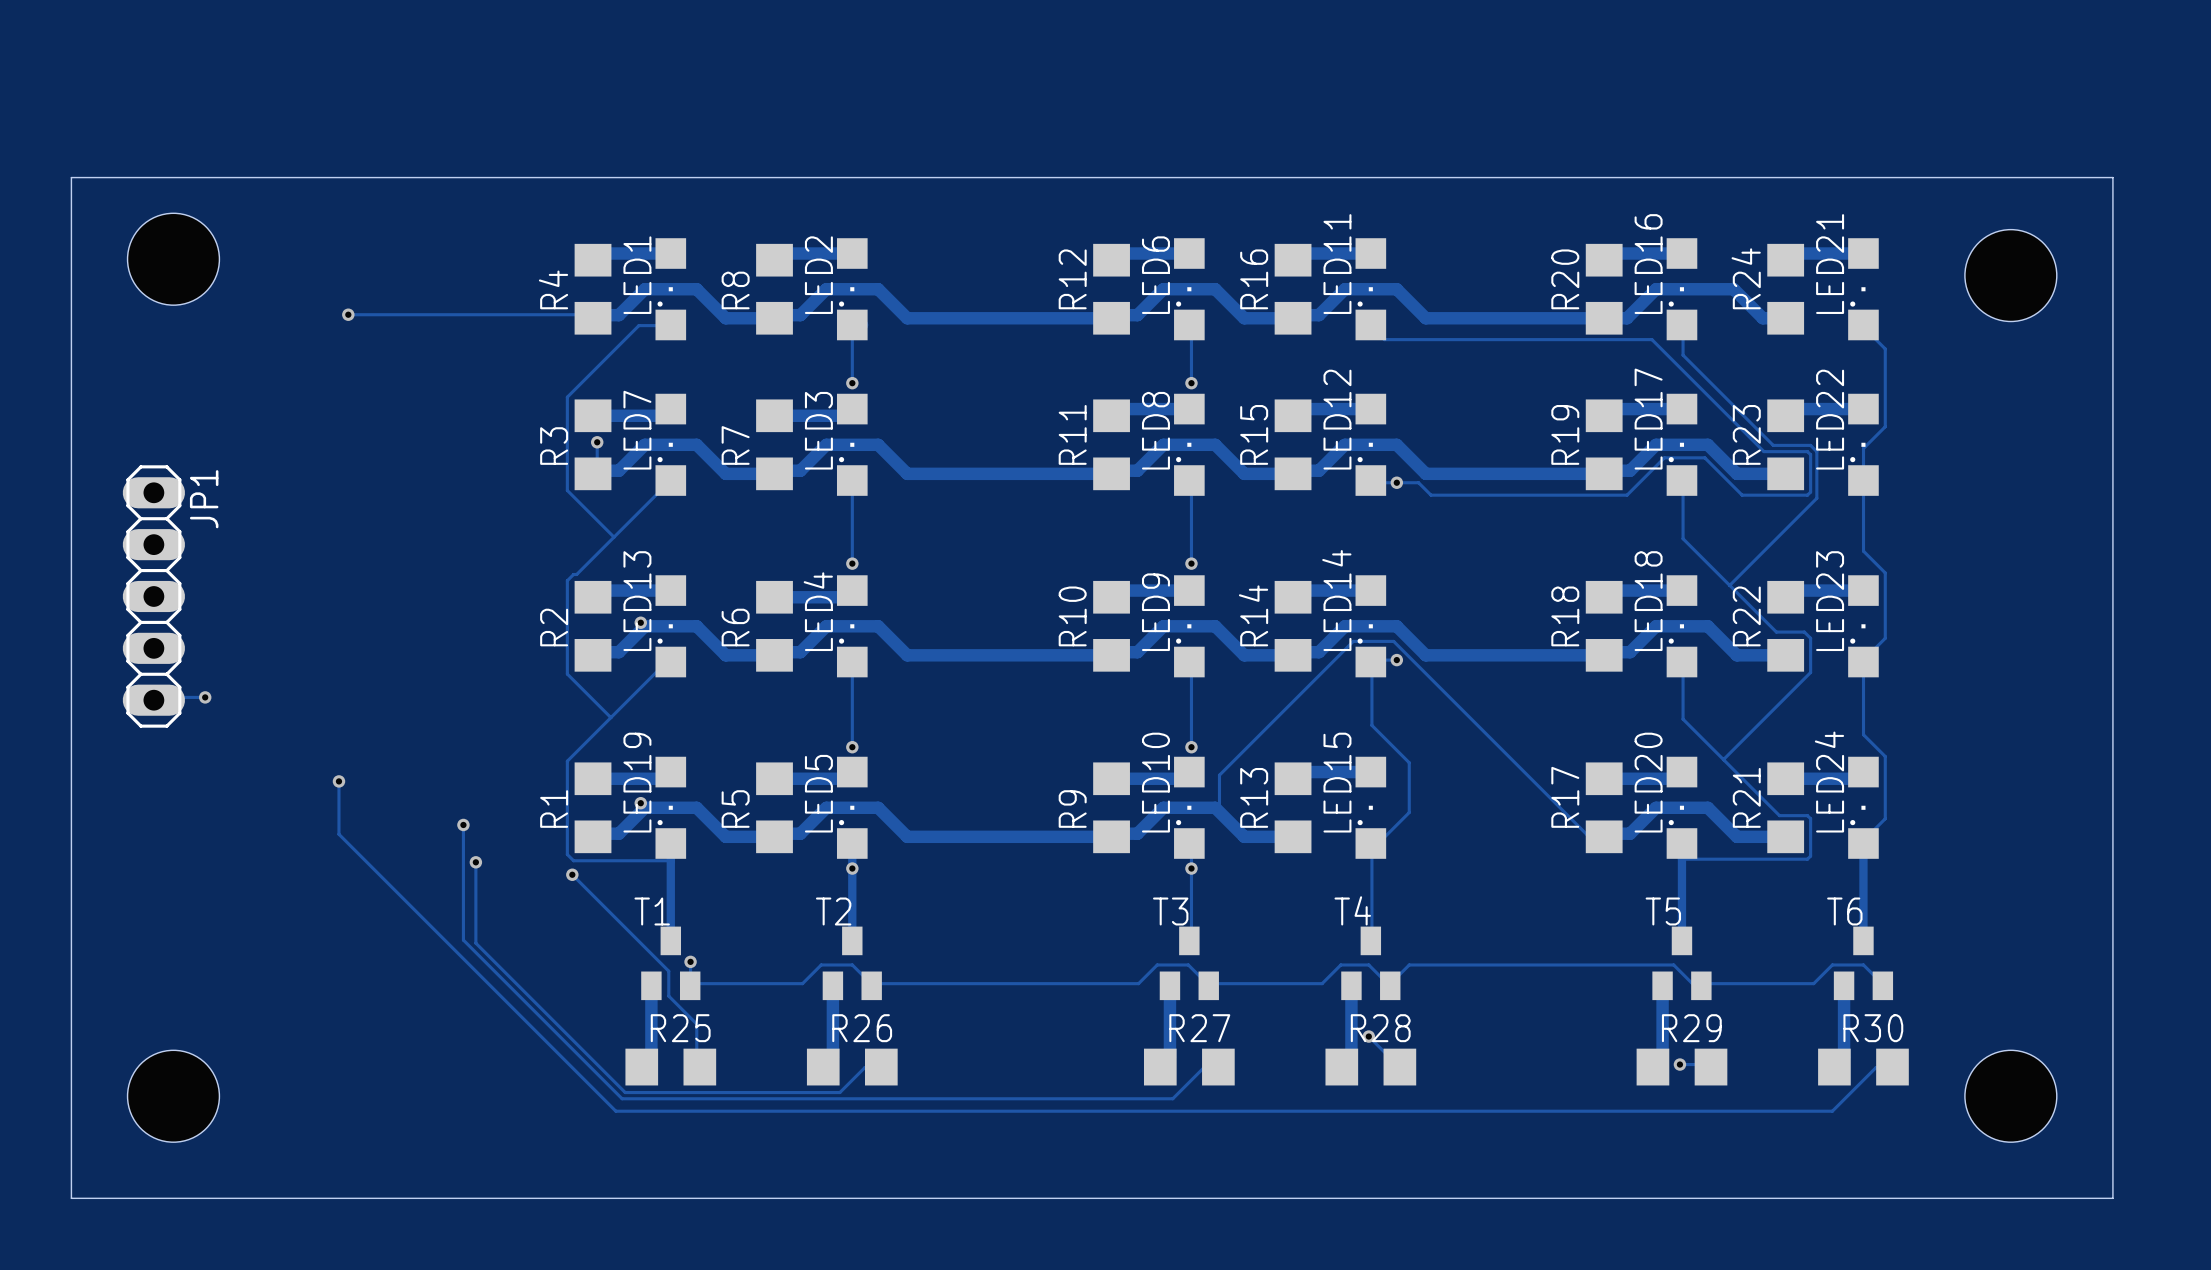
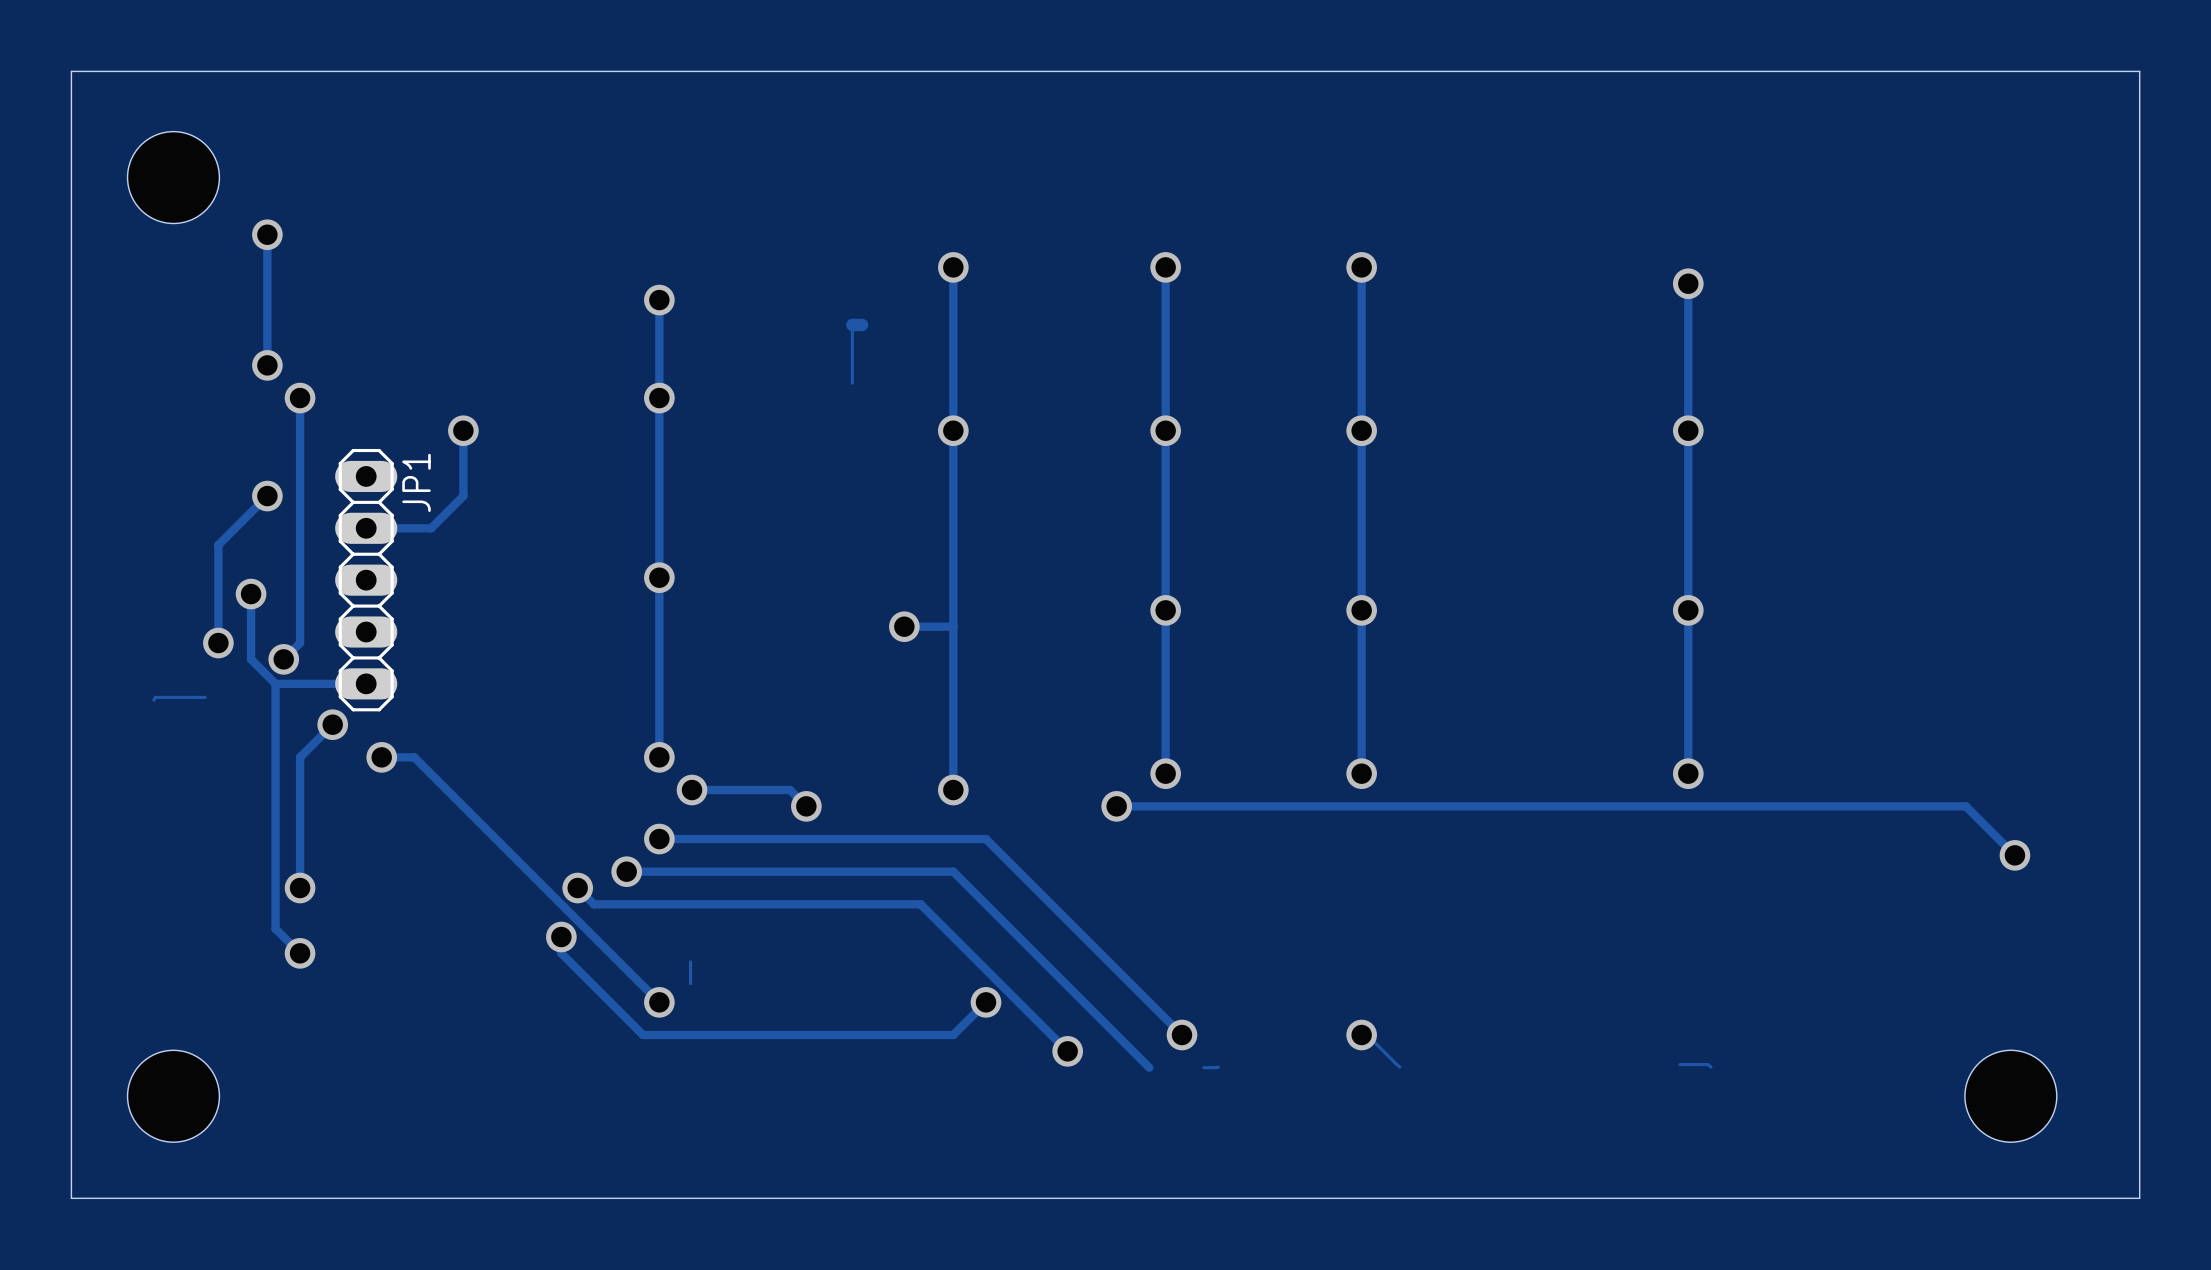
board edge: (71, 177) (2112, 177) (2112, 1198) -> (71, 177) (71, 71) (2139, 71) (2139, 1198) (2112, 1198)
track: none -> (267, 234) (267, 365)
via: none -> (267, 234)
track: (670, 253) (599, 253) (593, 260) -> none
track: (852, 253) (781, 253) (774, 260) -> none
track: (1189, 253) (1118, 253) (1111, 260) -> none
track: (1370, 253) (1299, 253) (1293, 260) -> none
track: (1681, 253) (1604, 253) (1604, 260) -> none
track: (1863, 253) (1785, 253) (1785, 260) -> none
hole position: (173, 259) -> (173, 177)
track: none -> (953, 267) (953, 790)
via: none -> (953, 267)
track: none -> (1165, 267) (1165, 773)
via: none -> (1165, 267)
track: none -> (1361, 267) (1361, 773)
via: none -> (1361, 267)
hole: (2010, 275) -> none
track: none -> (1688, 283) (1688, 773)
via: none -> (1688, 283)
R4: (593, 289) -> none
LED1: (670, 289) -> none
R8: (774, 289) -> none
LED2: (852, 289) -> none
R12: (1111, 289) -> none
LED6: (1189, 289) -> none
R16: (1293, 289) -> none
LED11: (1370, 289) -> none
R20: (1604, 289) -> none
LED16: (1681, 289) -> none
R24: (1785, 289) -> none
LED21: (1863, 289) -> none
track: none -> (659, 300) (659, 757)
via: none -> (659, 300)
track: (348, 314) (587, 314) (593, 318) (596, 315) (618, 315) (644, 289) (696, 289) (725, 318) (774, 318) (777, 315) (800, 315) (826, 289) (878, 289) (907, 318) (1111, 318) (1114, 315) (1137, 315) (1163, 289) (1215, 289) (1244, 318) (1293, 318) (1296, 315) (1318, 315) (1344, 289) (1396, 289) (1425, 318) (1627, 318) (1656, 289) (1733, 289) (1762, 318) (1785, 318) -> none
via: (348, 314) -> none
track: (670, 324) (638, 325) (567, 397) (567, 490) (614, 537) -> none
track: (1189, 324) (1191, 327) (1191, 383) -> none
track: (1370, 324) (1384, 339) (1651, 339) (1763, 451) (1807, 451) (1810, 454) (1810, 492) (1807, 495) (1742, 495) (1704, 457) (1664, 457) (1627, 495) (1431, 495) (1418, 482) (1371, 482) (1370, 480) -> none
track: (1681, 324) (1683, 355) (1773, 445) (1810, 445) (1816, 451) (1816, 498) (1729, 585) -> none
track: (1863, 324) (1885, 348) (1885, 426) (1863, 448) (1863, 551) (1885, 572) (1885, 638) (1863, 660) (1863, 734) (1885, 756) (1885, 818) (1863, 840) (1863, 940) -> none
via: none -> (267, 365)
via: (852, 383) -> none
via: (1191, 383) -> none
track: none -> (300, 398) (300, 643) (283, 659)
via: none -> (300, 398)
via: none -> (659, 398)
track: (670, 409) (664, 415) (593, 415) -> none
track: (852, 409) (845, 415) (774, 415) -> none
track: (1189, 409) (1118, 409) (1111, 415) -> none
track: (1370, 409) (1299, 409) (1293, 415) -> none
track: (1681, 409) (1610, 409) (1604, 415) -> none
track: (1863, 409) (1792, 409) (1785, 415) -> none
track: none -> (463, 430) (463, 496) (431, 528) (366, 528)
via: none -> (463, 430)
via: none -> (953, 430)
via: none -> (1165, 430)
via: none -> (1361, 430)
via: none -> (1688, 430)
track: (597, 442) (597, 467) (593, 473) (596, 470) (618, 470) (644, 444) (696, 444) (725, 473) (774, 473) (777, 470) (800, 470) (826, 444) (878, 444) (907, 473) (1111, 473) (1114, 470) (1137, 470) (1163, 444) (1215, 444) (1244, 473) (1293, 473) (1296, 470) (1318, 470) (1344, 444) (1396, 444) (1425, 473) (1604, 473) (1607, 470) (1630, 470) (1656, 444) (1707, 444) (1736, 473) (1785, 473) -> none
via: (597, 442) -> none
R3: (593, 444) -> none
LED7: (670, 444) -> none
R7: (774, 444) -> none
LED3: (852, 444) -> none
R11: (1111, 444) -> none
LED8: (1189, 444) -> none
R15: (1293, 444) -> none
LED12: (1370, 444) -> none
R19: (1604, 444) -> none
LED17: (1681, 444) -> none
R23: (1785, 444) -> none
LED22: (1863, 444) -> none
track: (670, 480) (576, 574) (573, 574) (567, 580) (567, 674) (610, 717) -> none
track: (852, 480) (852, 563) -> none
track: (1189, 480) (1191, 482) (1191, 563) -> none
track: (1681, 480) (1683, 538) (1776, 632) (1804, 632) (1810, 638) (1810, 672) (1723, 759) -> none
via: (1396, 482) -> none
track: none -> (267, 496) (218, 545) (218, 643)
via: none -> (267, 496)
via: (852, 563) -> none
via: (1191, 563) -> none
via: none -> (659, 577)
track: (670, 590) (599, 590) (593, 597) -> none
track: (852, 590) (845, 597) (774, 597) -> none
track: (1189, 590) (1118, 590) (1111, 597) -> none
track: (1370, 590) (1299, 590) (1293, 597) -> none
track: (1681, 590) (1610, 590) (1604, 597) -> none
track: (1863, 590) (1792, 590) (1785, 597) -> none
track: none -> (251, 594) (251, 659) (275, 683)
via: none -> (251, 594)
JP1 position: (153, 596) -> (366, 580)
via: none -> (1165, 610)
via: none -> (1361, 610)
via: none -> (1688, 610)
via: (640, 622) -> none
R2: (593, 626) -> none
LED13: (670, 626) -> none
R6: (774, 626) -> none
LED4: (852, 626) -> none
track: none -> (904, 626) (953, 626)
via: none -> (904, 626)
R10: (1111, 626) -> none
LED9: (1189, 626) -> none
R14: (1293, 626) -> none
LED14: (1370, 626) -> none
R18: (1604, 626) -> none
LED18: (1681, 626) -> none
R22: (1785, 626) -> none
LED23: (1863, 626) -> none
via: none -> (218, 643)
track: (593, 655) (596, 652) (618, 652) (644, 626) (696, 626) (725, 655) (774, 655) (777, 652) (800, 652) (826, 626) (878, 626) (907, 655) (1111, 655) (1114, 652) (1137, 652) (1163, 626) (1215, 626) (1244, 655) (1293, 655) (1296, 652) (1318, 652) (1344, 626) (1396, 626) (1425, 655) (1604, 655) (1607, 652) (1630, 652) (1656, 626) (1707, 626) (1736, 655) (1785, 655) -> none
via: none -> (283, 659)
track: (1396, 660) (1371, 660) (1370, 662) (1371, 725) (1409, 762) (1409, 812) (1381, 840) (1371, 840) (1370, 843) (1370, 940) -> none
via: (1396, 660) -> none
track: (670, 662) (670, 664) (663, 664) (567, 761) (567, 854) (573, 860) (670, 860) -> none
track: (852, 662) (852, 747) -> none
track: (1189, 662) (1191, 663) (1191, 747) -> none
track: (1681, 662) (1683, 719) (1779, 815) (1807, 815) (1810, 818) (1810, 856) (1807, 859) (1681, 859) -> none
track: none -> (275, 683) (366, 683)
track: none -> (275, 683) (275, 928) (300, 953)
via: (205, 697) -> none
track: none -> (332, 724) (300, 757) (300, 888)
via: none -> (332, 724)
via: (852, 747) -> none
via: (1191, 747) -> none
track: none -> (381, 757) (414, 757) (659, 1002)
via: none -> (381, 757)
via: none -> (659, 757)
track: (670, 772) (664, 778) (593, 778) -> none
track: (852, 772) (845, 778) (774, 778) -> none
track: (1189, 772) (1182, 778) (1111, 778) -> none
track: (1370, 772) (1299, 772) (1293, 778) -> none
track: (1681, 772) (1675, 778) (1604, 778) -> none
track: (1863, 772) (1856, 778) (1785, 778) -> none
via: none -> (1165, 773)
via: none -> (1361, 773)
via: none -> (1688, 773)
track: (338, 781) (338, 834) (615, 1111) (1832, 1111) (1875, 1067) (1892, 1067) -> none
via: (338, 781) -> none
track: none -> (692, 790) (790, 790) (806, 806)
via: none -> (692, 790)
via: none -> (953, 790)
via: (640, 803) -> none
via: none -> (806, 806)
track: none -> (1116, 806) (1965, 806) (2014, 855)
via: none -> (1116, 806)
R1: (593, 807) -> none
track: (644, 807) (618, 833) (596, 833) (593, 836) -> none
track: (644, 807) (696, 807) (725, 836) (774, 836) (777, 833) (800, 833) (826, 807) (878, 807) (907, 836) (1111, 836) (1114, 833) (1137, 833) (1163, 807) (1215, 807) -> none
LED19: (670, 807) -> none
R5: (774, 807) -> none
LED5: (852, 807) -> none
R9: (1111, 807) -> none
LED10: (1189, 807) -> none
track: (1215, 807) (1244, 836) (1293, 836) -> none
track: (1215, 807) (1219, 803) (1219, 775) (1353, 641) (1393, 641) (1586, 834) (1599, 834) (1604, 836) (1607, 833) (1630, 833) (1656, 807) (1707, 807) (1736, 836) (1785, 836) -> none
R13: (1293, 807) -> none
LED15: (1370, 807) -> none
R17: (1604, 807) -> none
LED20: (1681, 807) -> none
R21: (1785, 807) -> none
LED24: (1863, 807) -> none
track: (463, 824) (463, 940) (622, 1098) (1172, 1098) (1203, 1067) -> none
via: (463, 824) -> none
track: none -> (659, 839) (986, 839) (1182, 1035)
via: none -> (659, 839)
track: (670, 843) (670, 940) -> none
track: (852, 843) (852, 940) -> none
track: (1189, 843) (1191, 843) (1191, 940) (1189, 940) -> none
track: (1681, 843) (1681, 940) -> none
via: none -> (2014, 855)
track: (475, 862) (475, 943) (625, 1092) (839, 1092) (864, 1067) (881, 1067) -> none
via: (475, 862) -> none
via size: [566, 868, 579, 881] -> [562, 872, 594, 904]
via: (852, 868) -> none
via: (1191, 868) -> none
track: none -> (626, 871) (953, 871) (1149, 1067)
via: none -> (626, 871)
track: (572, 874) (668, 971) (668, 996) (696, 1024) (696, 1064) (699, 1067) -> none
via: none -> (300, 888)
track: none -> (577, 888) (594, 904) (920, 904) (1067, 1051)
track: none -> (561, 937) (561, 953) (643, 1035) (953, 1035) (986, 1002)
via: none -> (561, 937)
via: none -> (300, 953)
via: (690, 961) -> none
T1: (670, 963) -> none
T2: (852, 963) -> none
T3: (1189, 963) -> none
T4: (1370, 963) -> none
T5: (1681, 963) -> none
T6: (1863, 963) -> none
track: (651, 985) (651, 1057) (641, 1067) -> none
track: (690, 985) (690, 983) (802, 983) (821, 964) (852, 964) (871, 985) (874, 983) (1138, 983) (1157, 964) (1188, 964) (1208, 985) (1210, 983) (1322, 983) (1340, 964) (1368, 964) (1390, 985) (1409, 964) (1673, 964) (1692, 983) (1701, 985) (1701, 983) (1813, 983) (1832, 964) (1863, 964) (1882, 985) -> none
track: (832, 985) (832, 1057) (823, 1067) -> none
track: (1169, 985) (1169, 1057) (1160, 1067) -> none
track: (1351, 985) (1351, 1057) (1341, 1067) -> none
track: (1662, 985) (1662, 1057) (1652, 1067) -> none
track: (1844, 985) (1844, 1057) (1834, 1067) -> none
via: none -> (659, 1002)
via: none -> (986, 1002)
via size: [1362, 1030, 1376, 1043] -> [1346, 1019, 1377, 1051]
via: none -> (1182, 1035)
via: none -> (1067, 1051)
via: (1679, 1064) -> none
R25: (670, 1067) -> none
R26: (852, 1067) -> none
R27: (1189, 1067) -> none
R28: (1370, 1067) -> none
R29: (1681, 1067) -> none
R30: (1863, 1067) -> none

